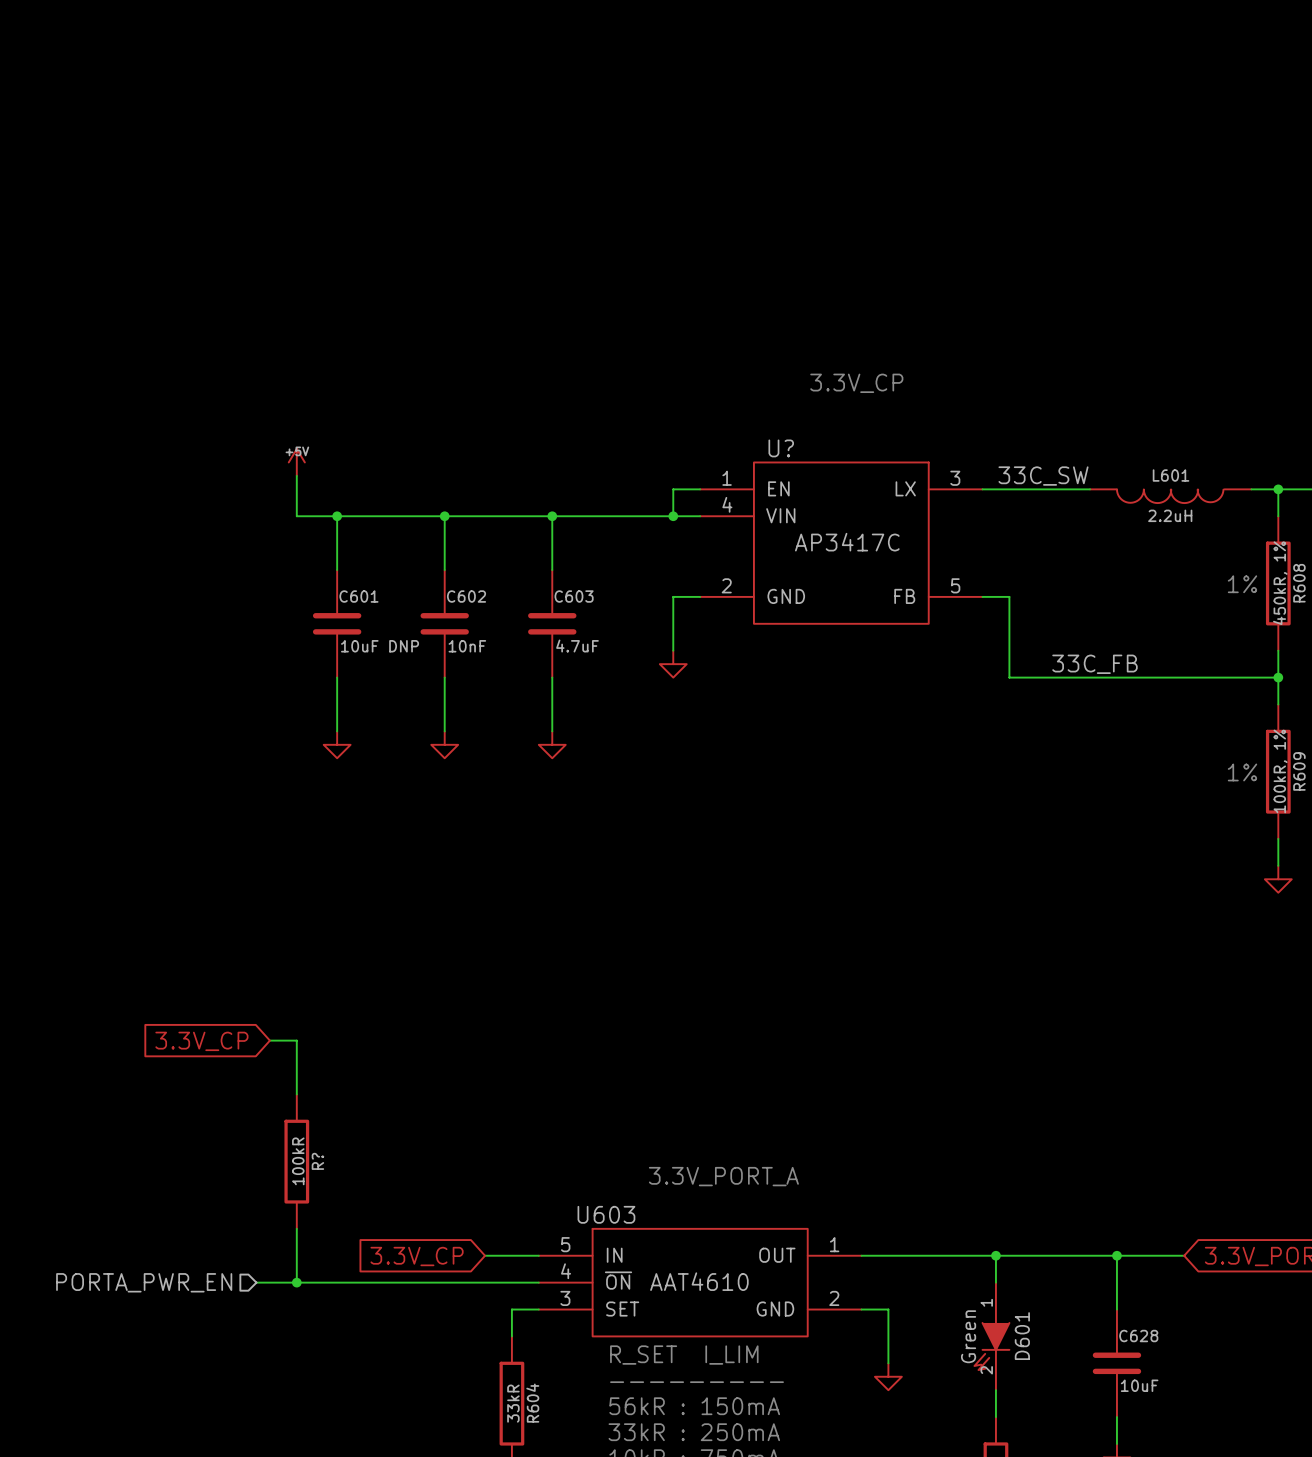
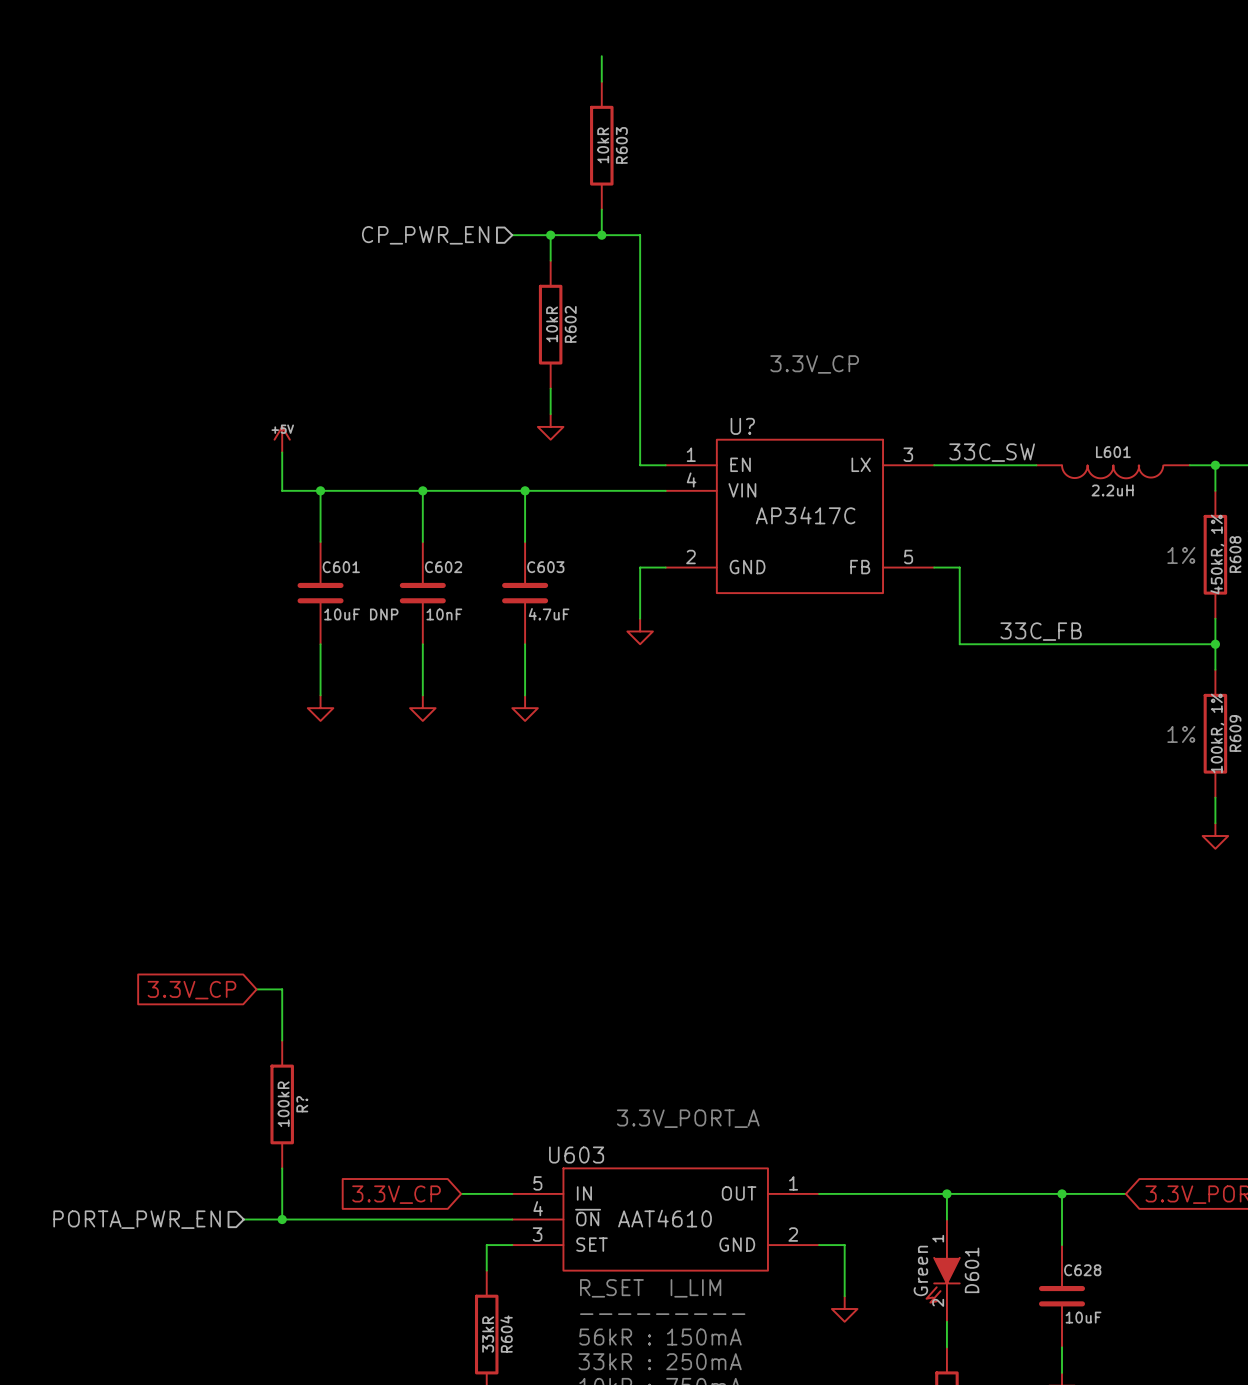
wire: none -> (601, 56) (601, 81)
R603: none -> 10kR (601, 145)
wire: none -> (601, 209) (601, 235)
hierarchical label: none -> CP_PWR_EN (425, 235)
wire: none -> (550, 235) (550, 260)
junction: none -> (550, 235)
junction: none -> (601, 235)
R602: none -> 10kR (550, 324)
wire: none -> (550, 388) (550, 414)
power symbol: none -> (550, 426)
wire: (673, 489) (673, 516) -> (640, 465) (640, 235) (512, 235)
junction: (673, 516) -> none

